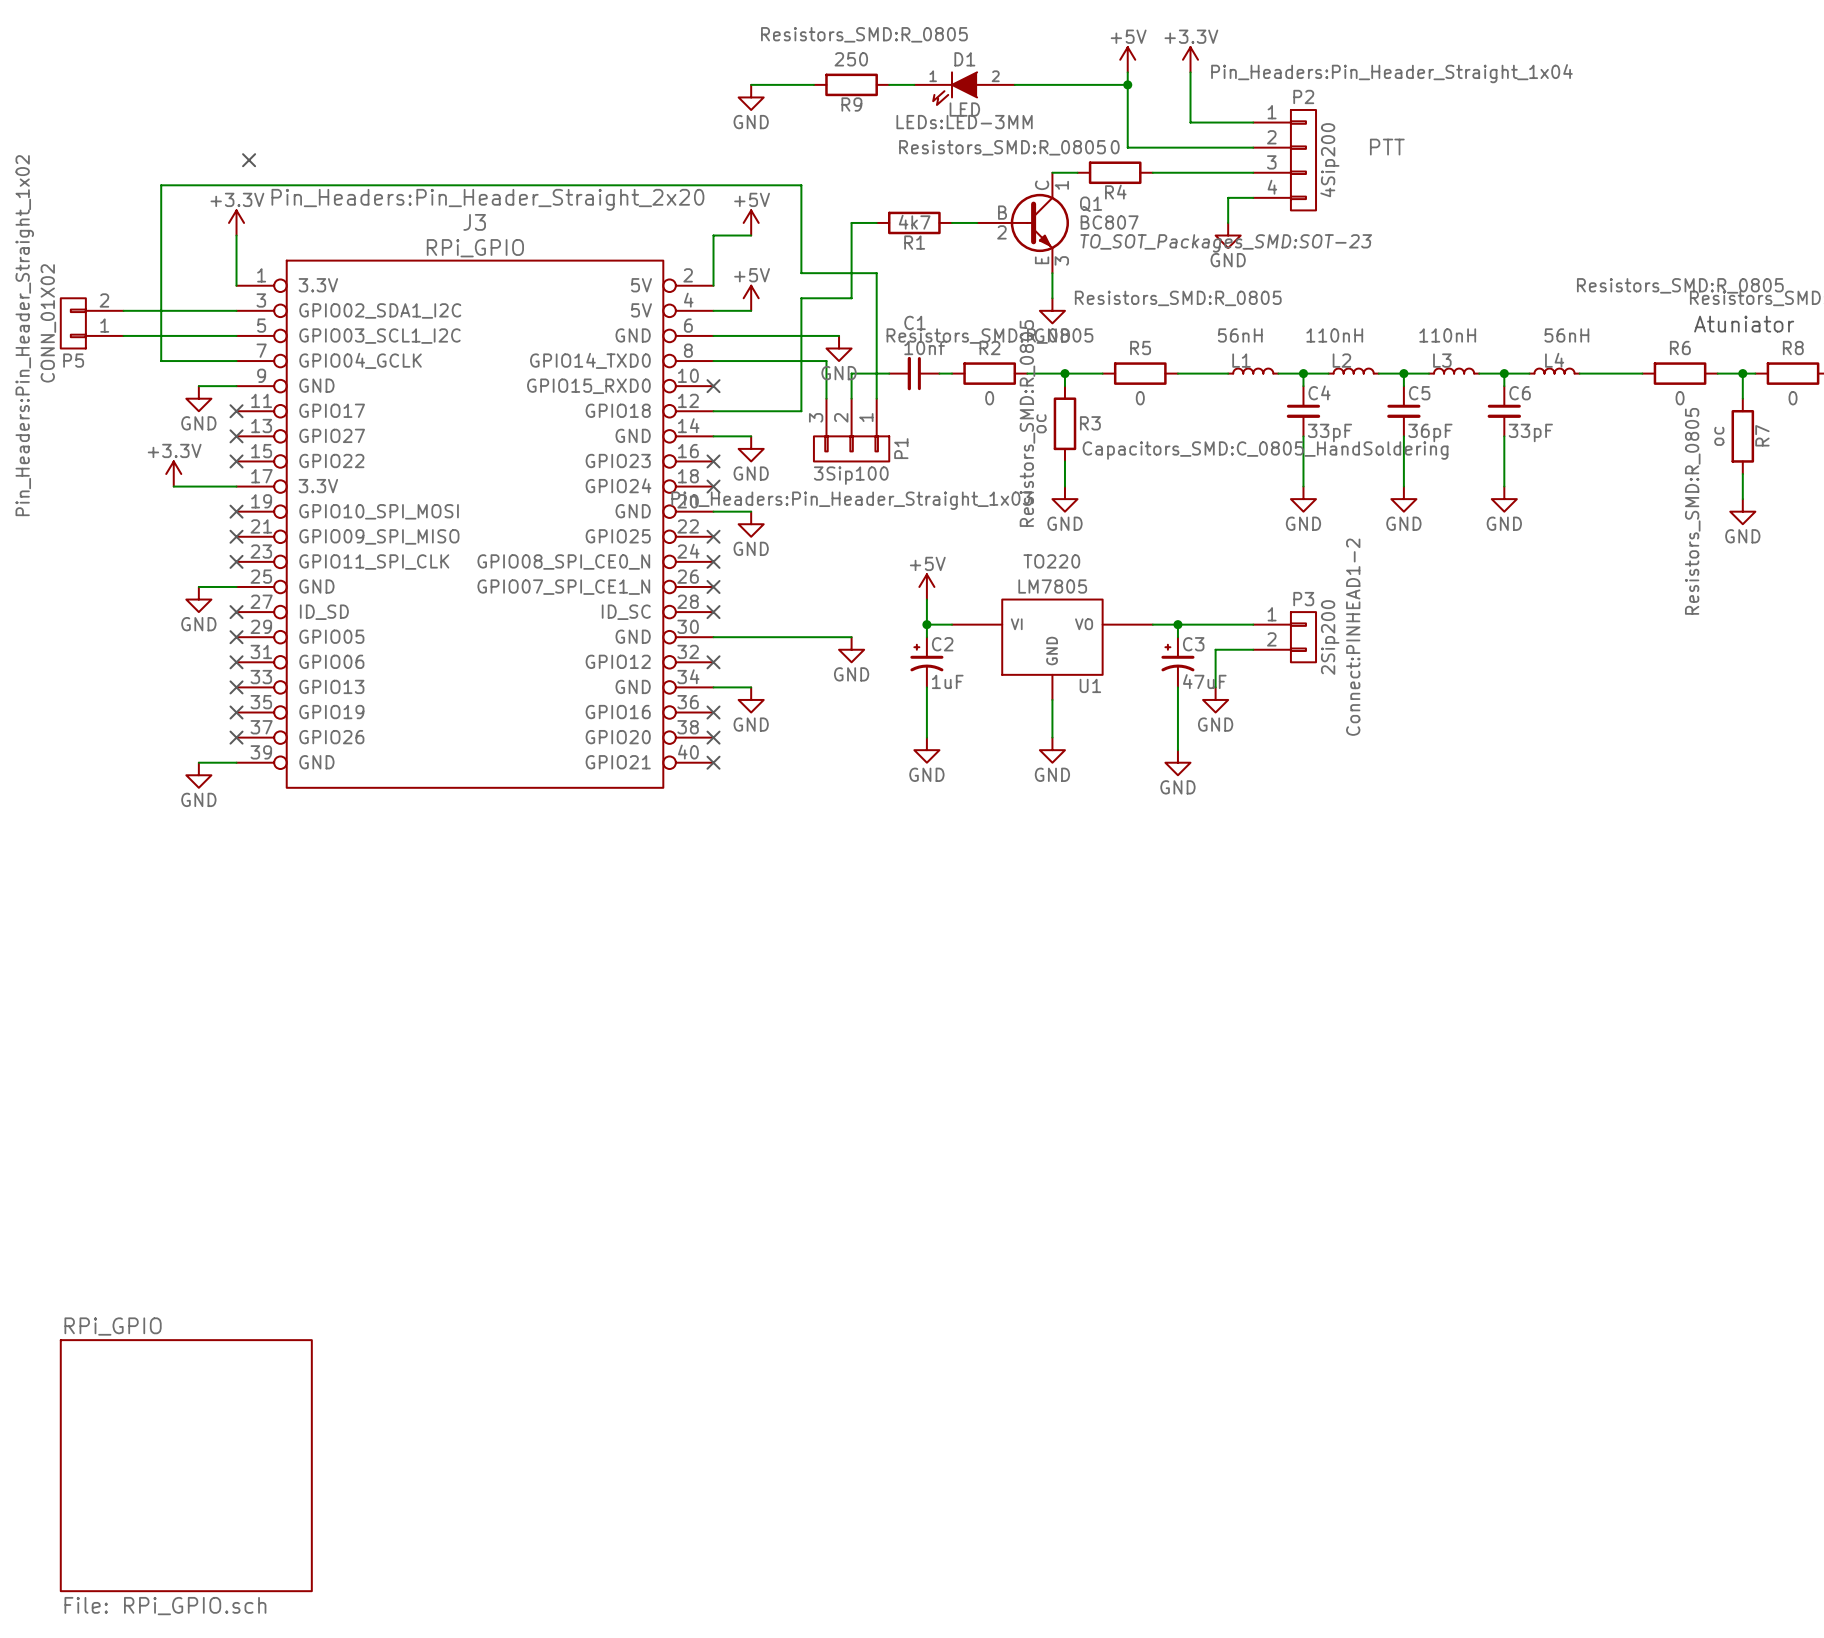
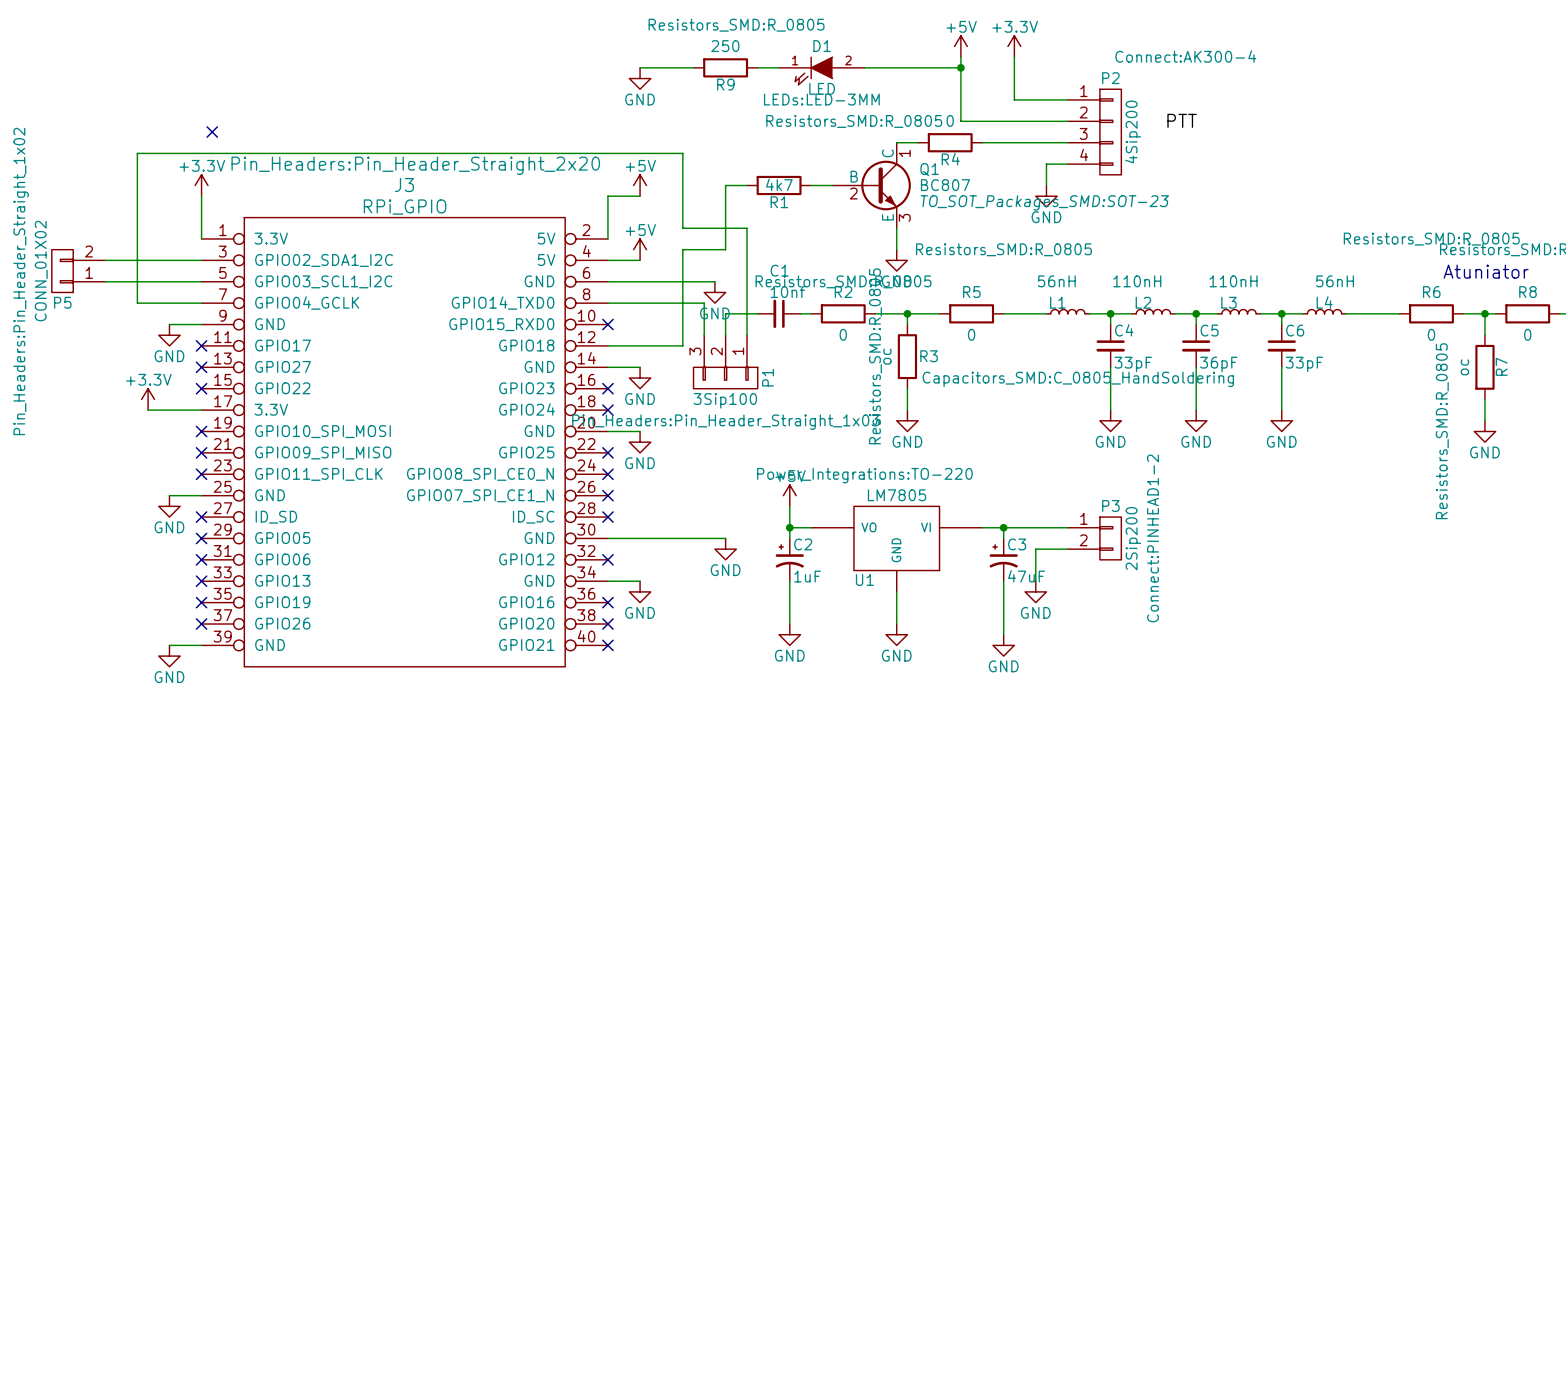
P2 text: Pin_Headers:Pin_Header_Straight_1x04 (1391, 73) -> Connect:AK300-4 (1185, 56)
U1 text: TO220 (1051, 561) -> Power_Integrations:TO-220 (864, 475)
U1 flip: as is (1052, 637) -> left-right (896, 538)
sheet RPi_GPIO: File: RPi_GPIO.sch (186, 1465) -> none

